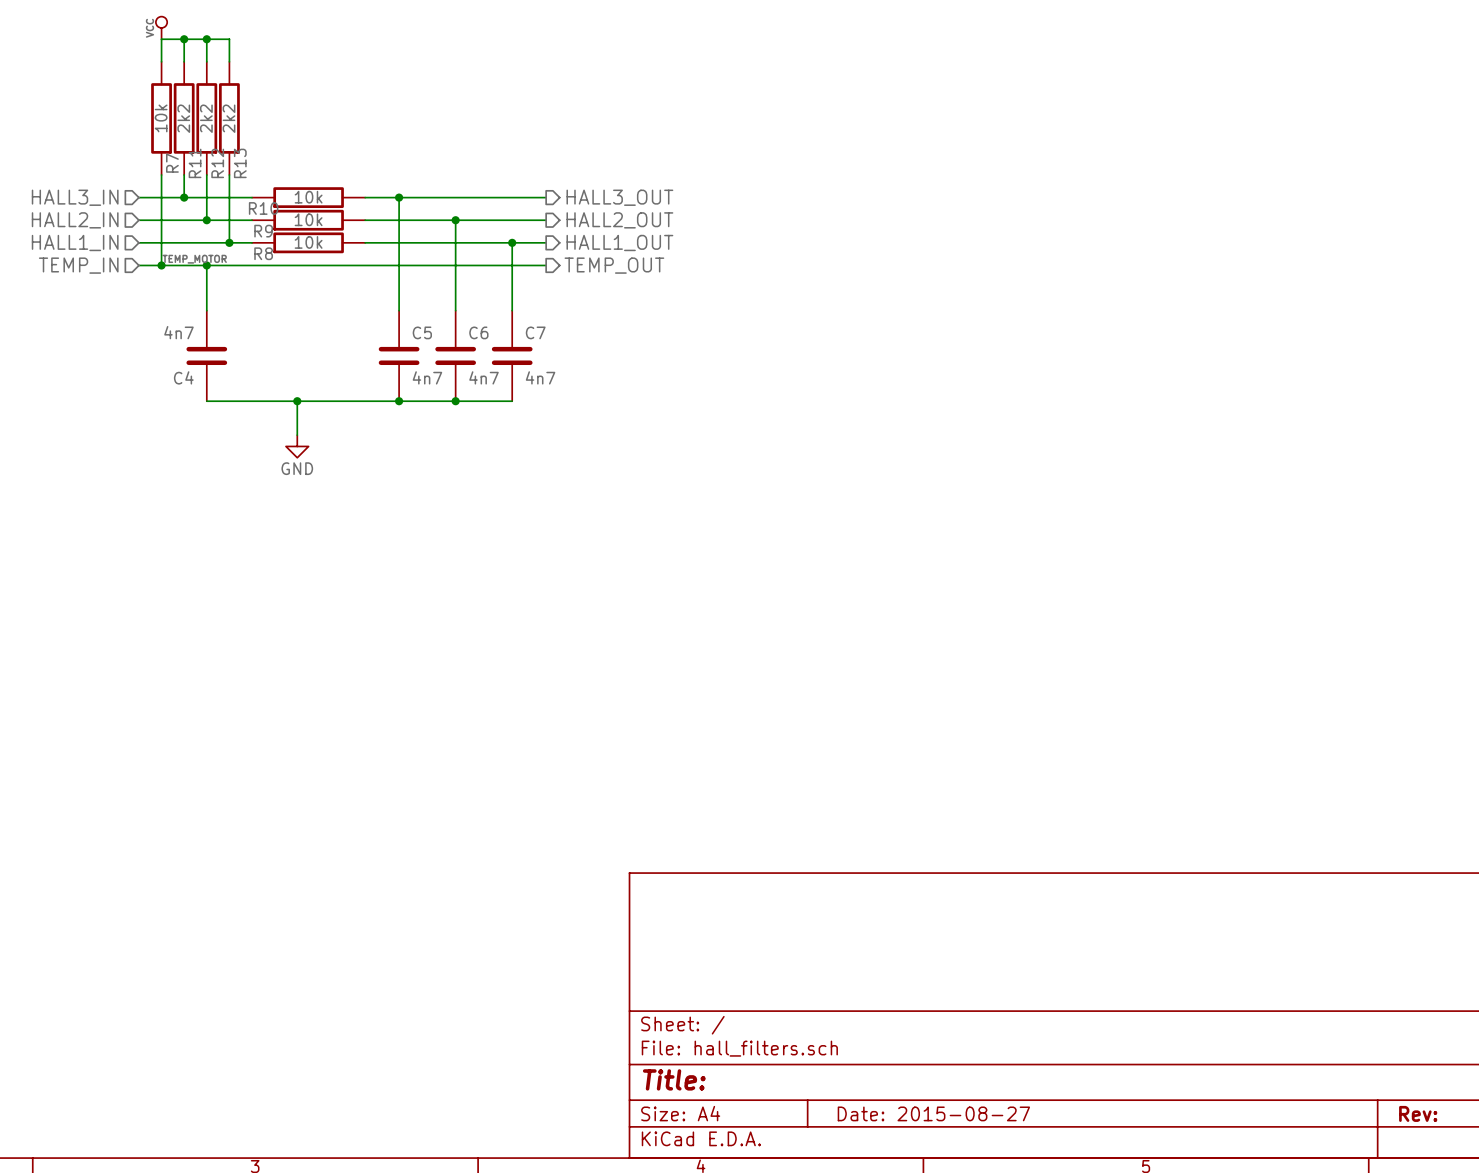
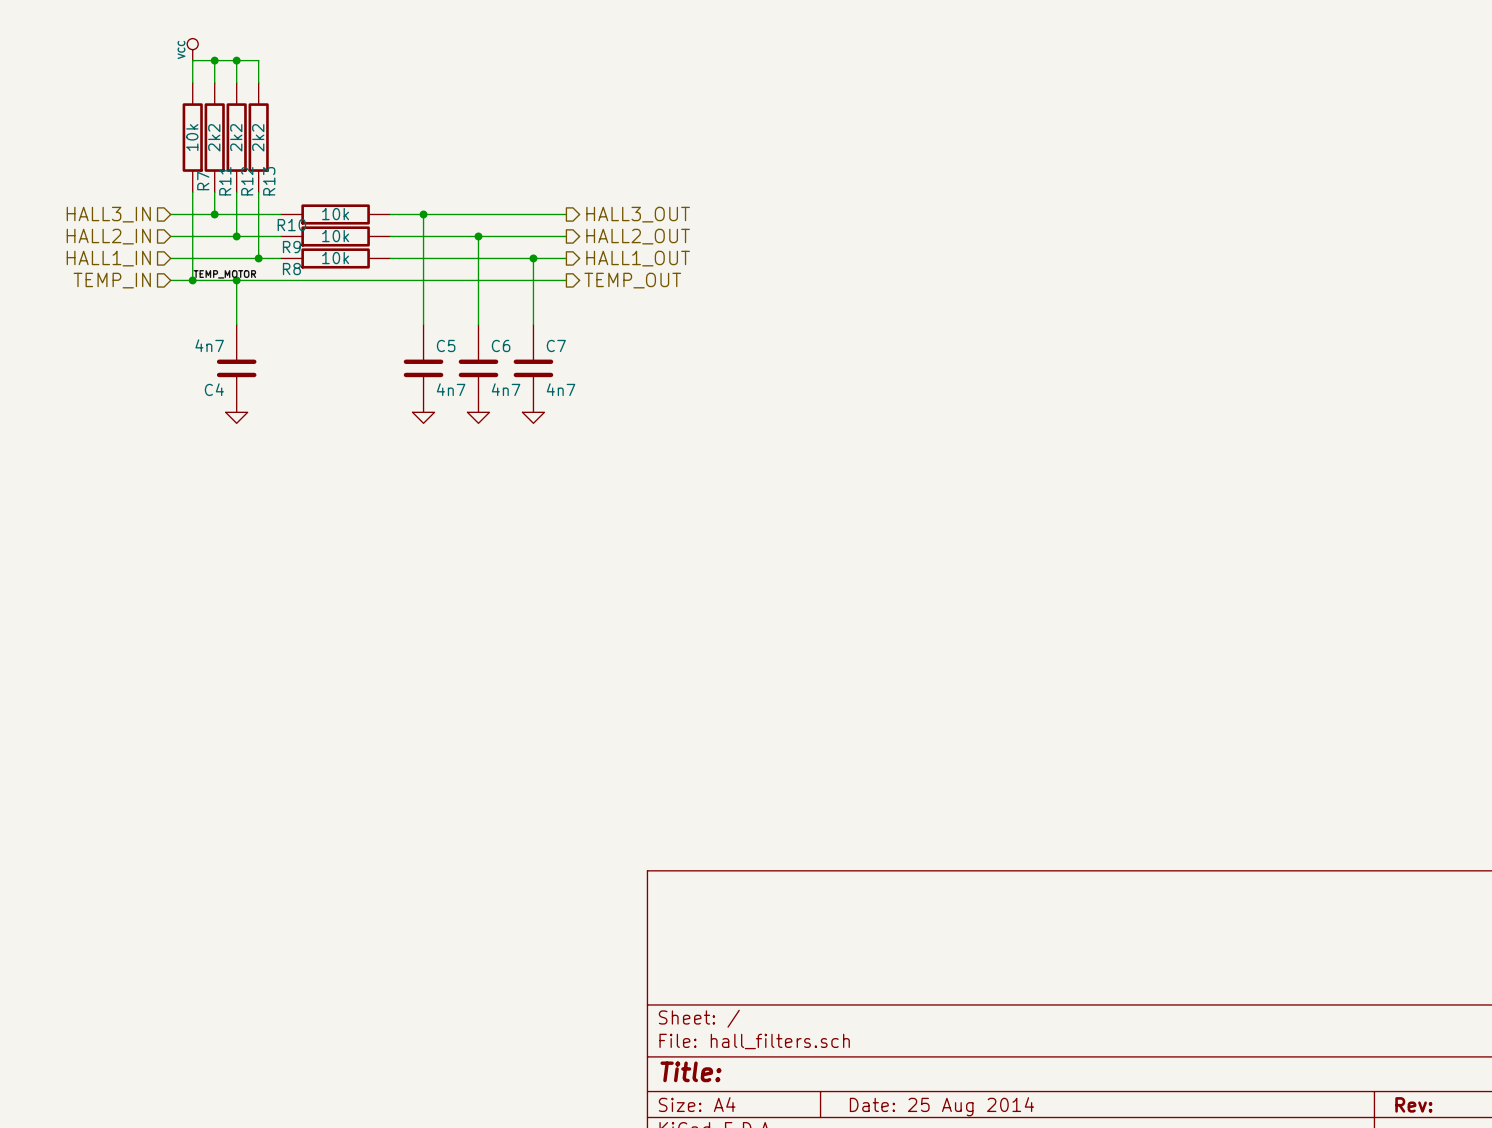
wire: (206, 401) (512, 401) -> none
wire: (297, 401) (297, 435) -> none
junction: (297, 401) -> none
junction: (399, 401) -> none
junction: (455, 401) -> none
power symbol: none -> (236, 417)
power symbol: none -> (423, 417)
power symbol: none -> (478, 417)
power symbol: none -> (533, 417)
power symbol: GND (297, 446) -> none
title block: Date: 2015-08-27 (933, 1113) -> Date: 25 Aug 2014 (941, 1106)

